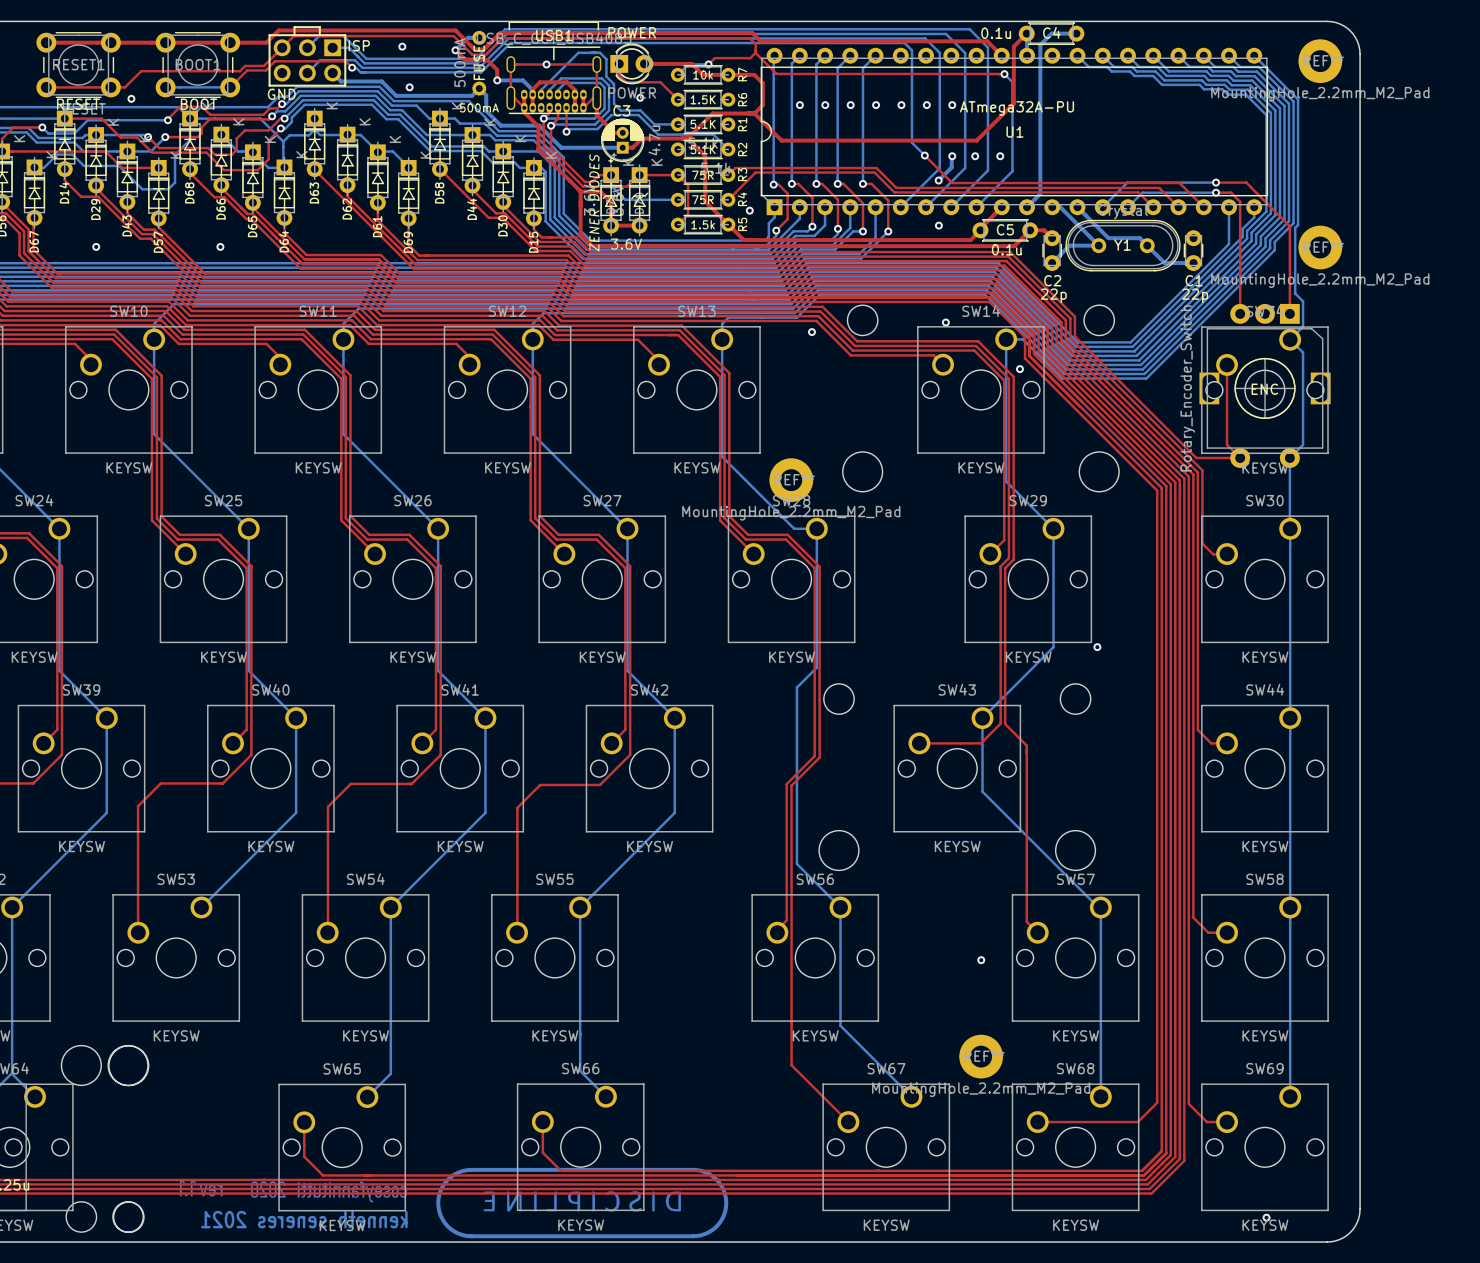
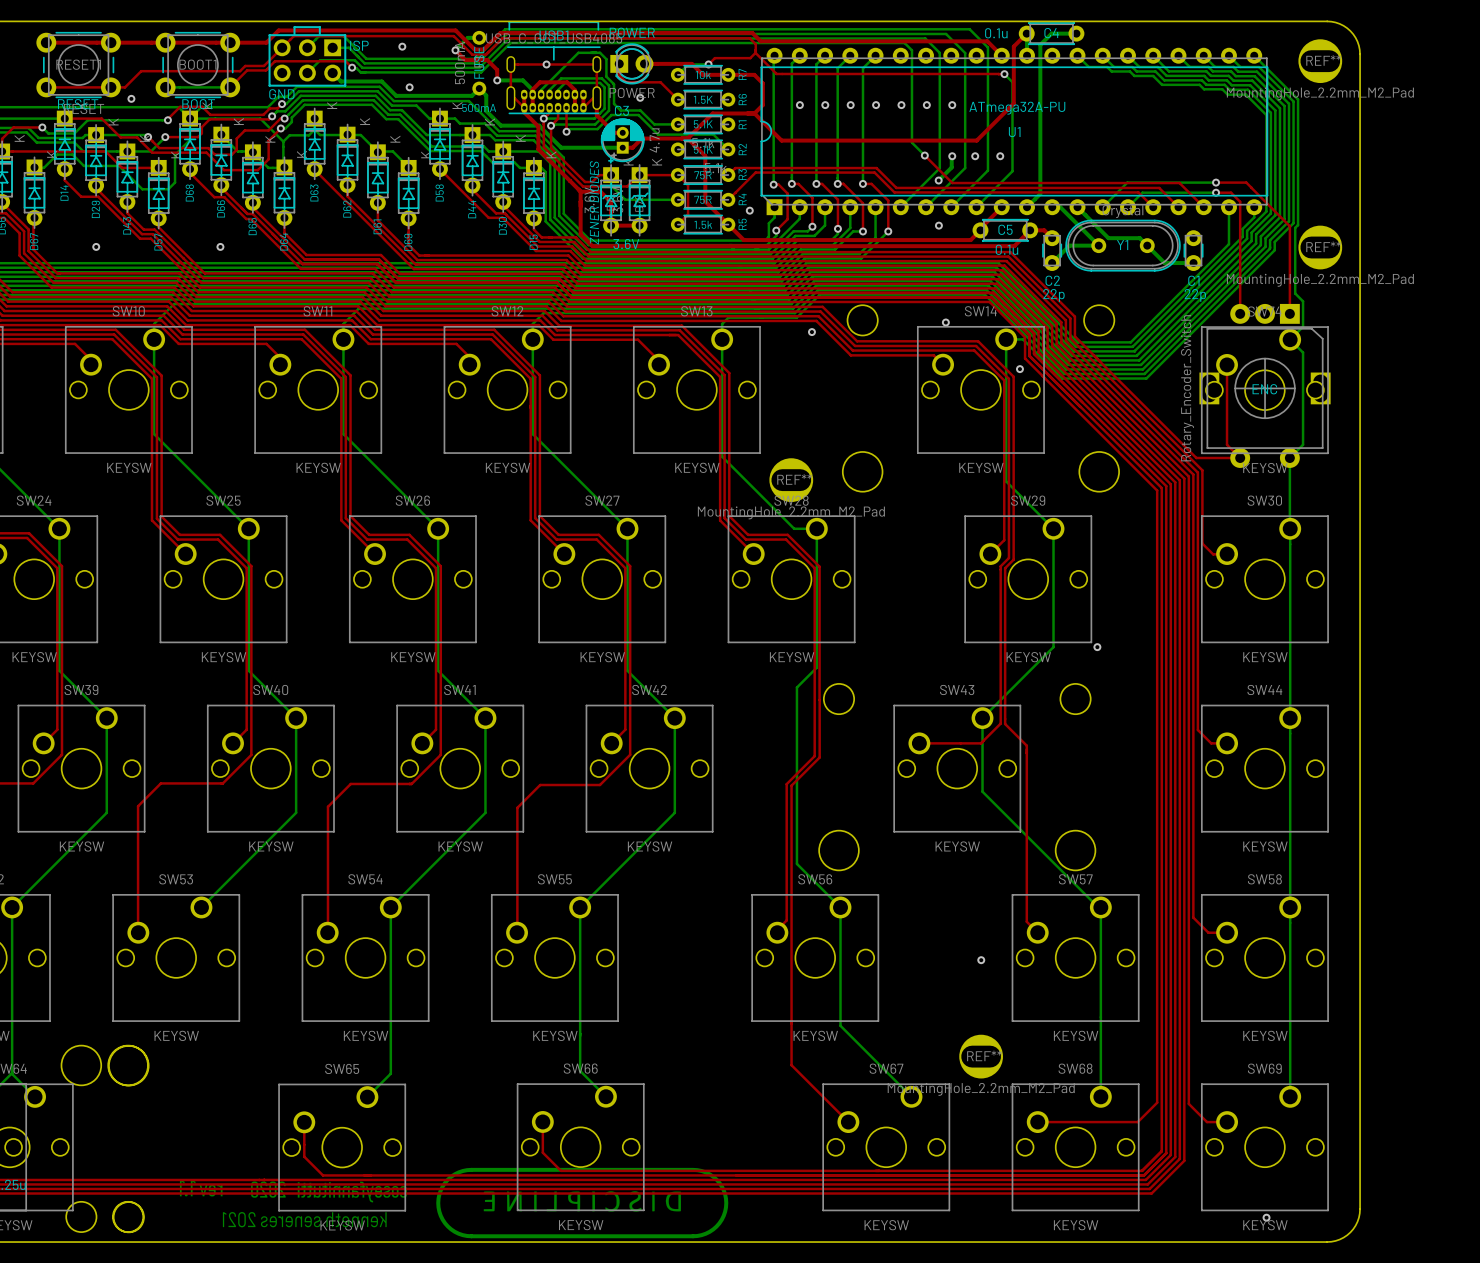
REF** footprint: [1298, 39, 1343, 84] -> [1298, 39, 1343, 84]
REF** footprint: [1298, 225, 1343, 270] -> [1298, 225, 1343, 270]
part footprint: [1199, 303, 1331, 468] -> [1199, 303, 1331, 468]
REF** footprint: [769, 458, 814, 502] -> [769, 458, 814, 502]
REF** footprint: [959, 1034, 1003, 1079] -> [959, 1034, 1003, 1079]

